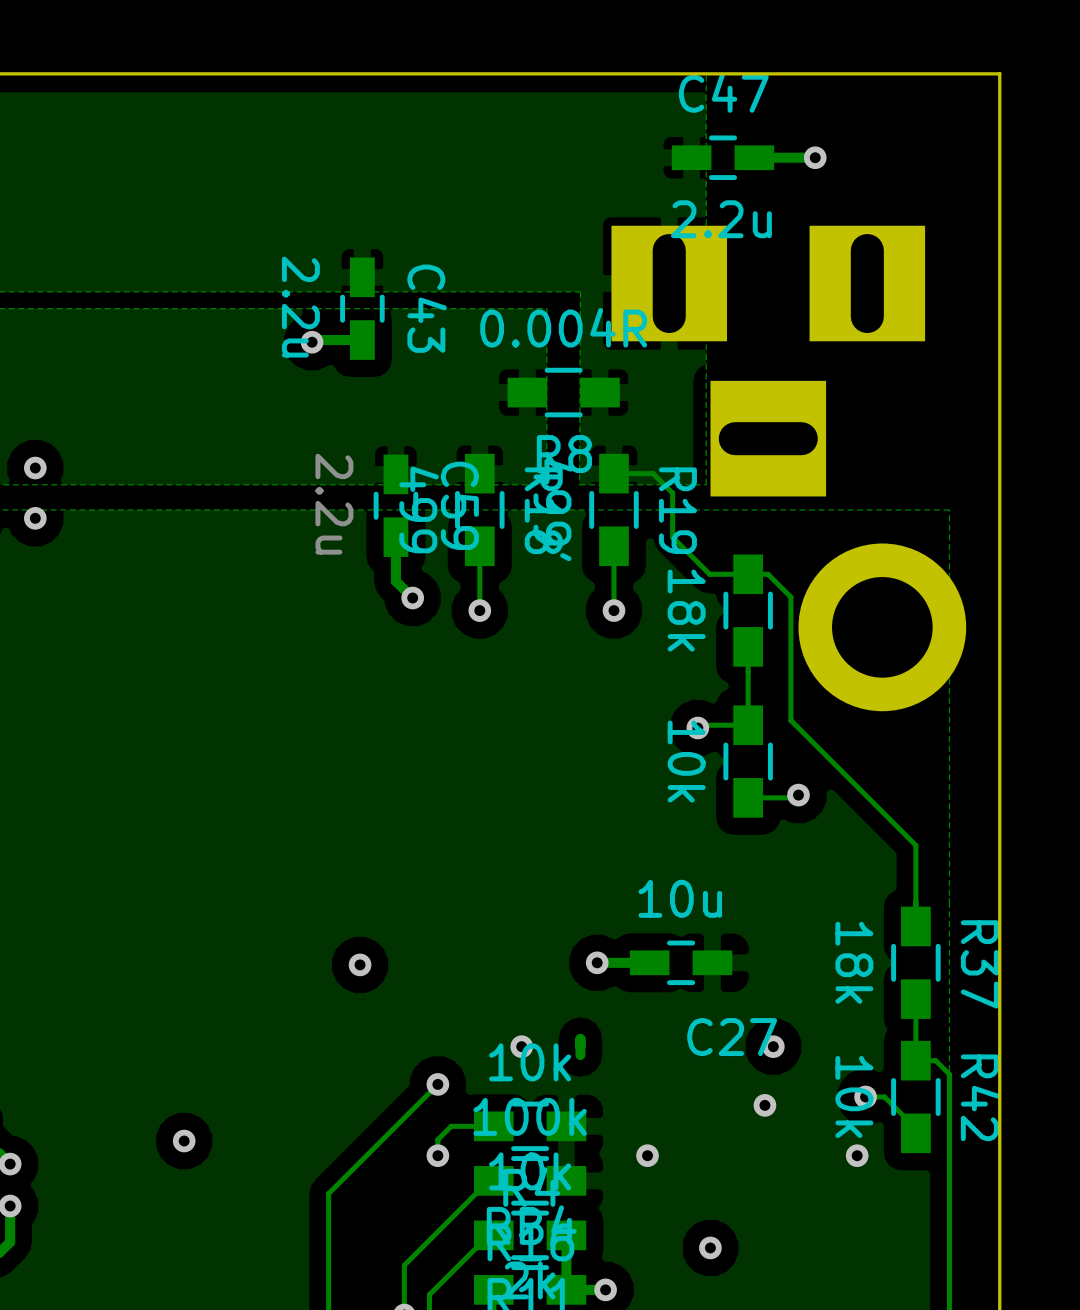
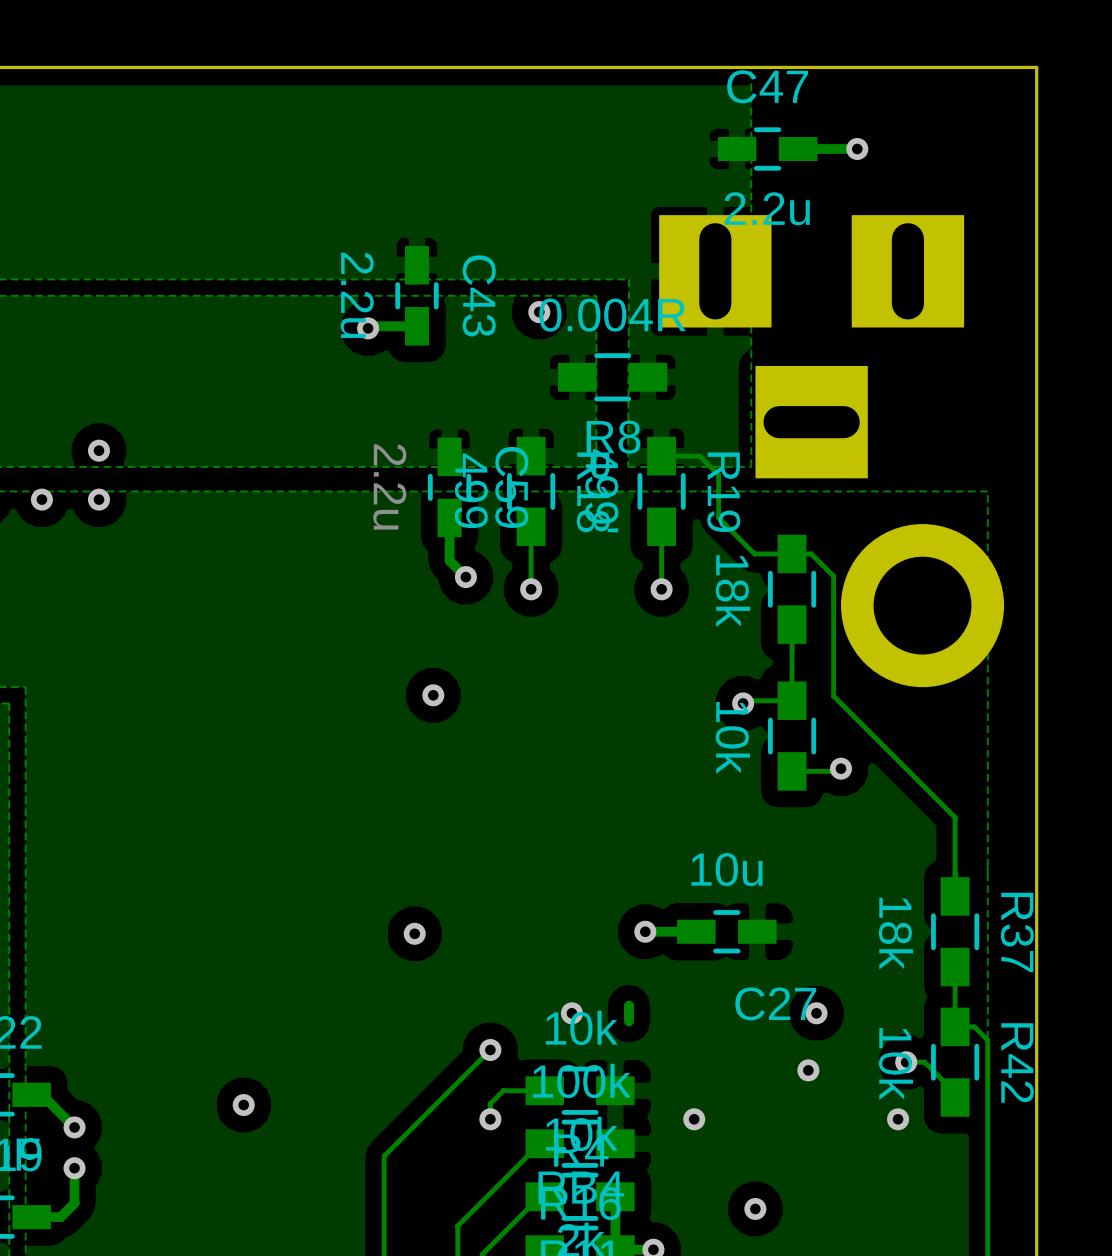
via: none -> (539, 312)
via: none -> (433, 695)

